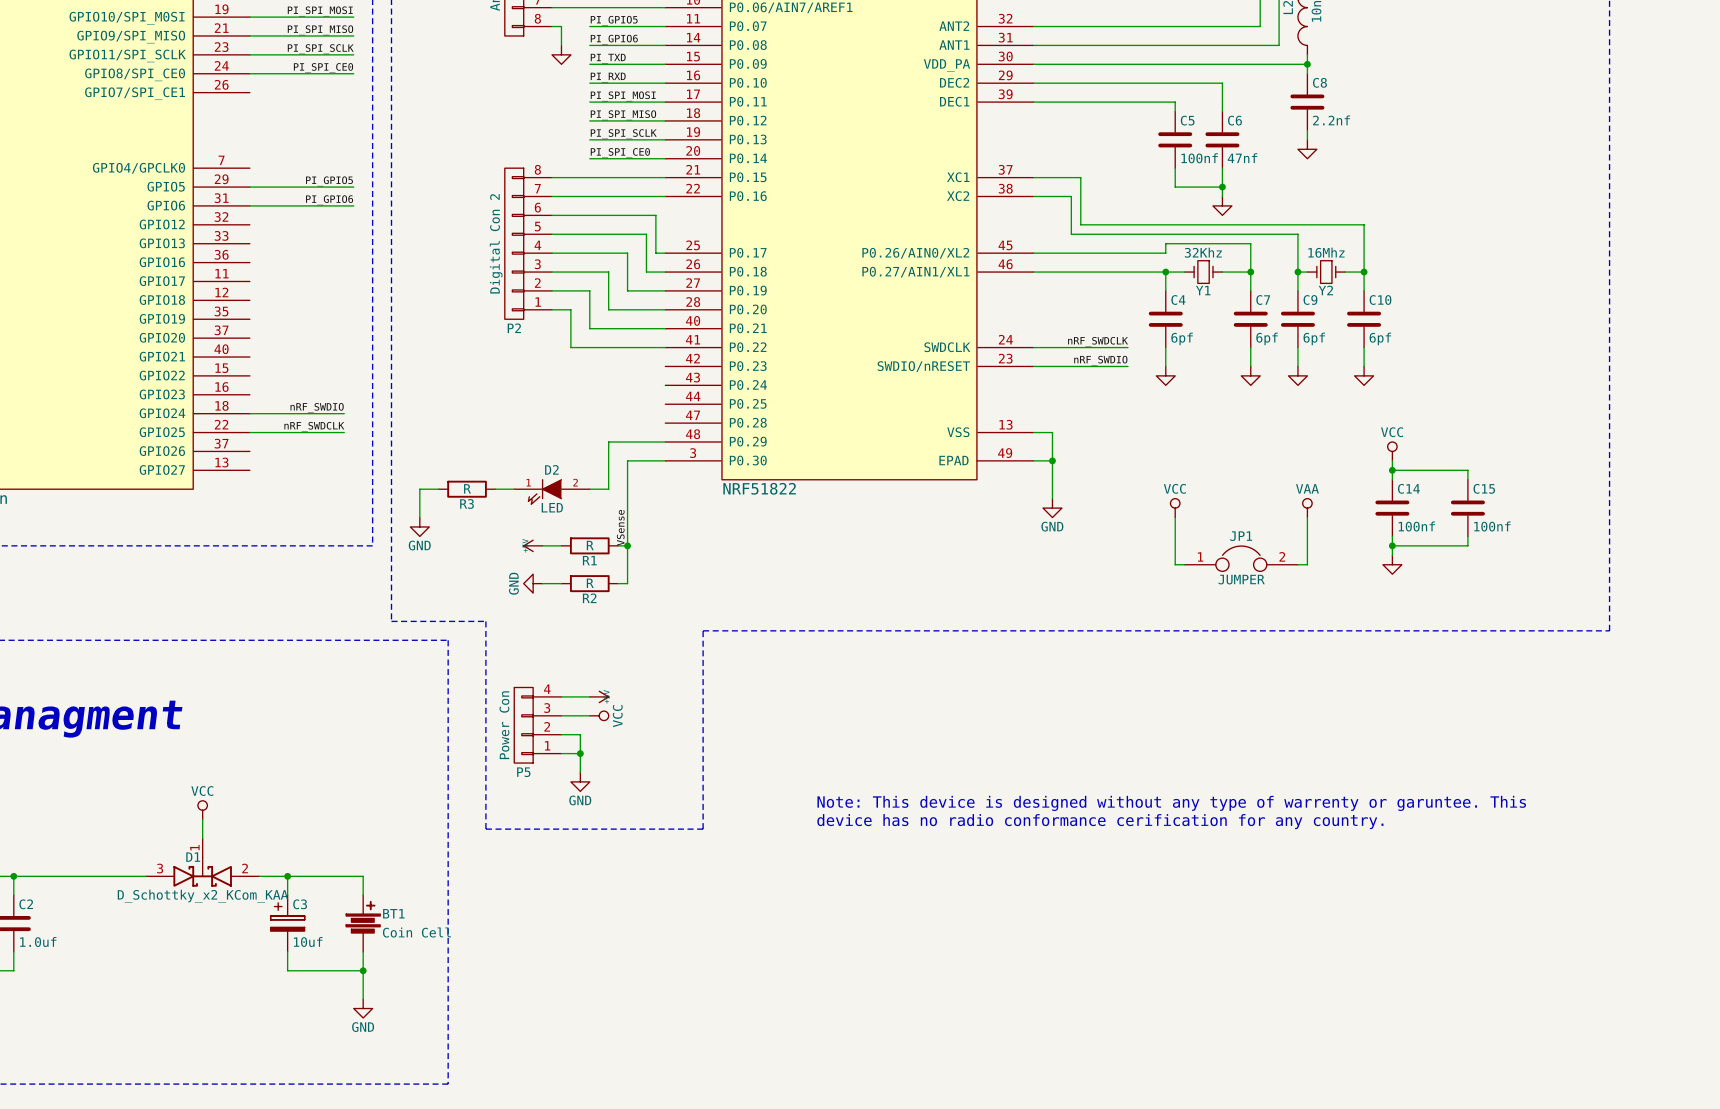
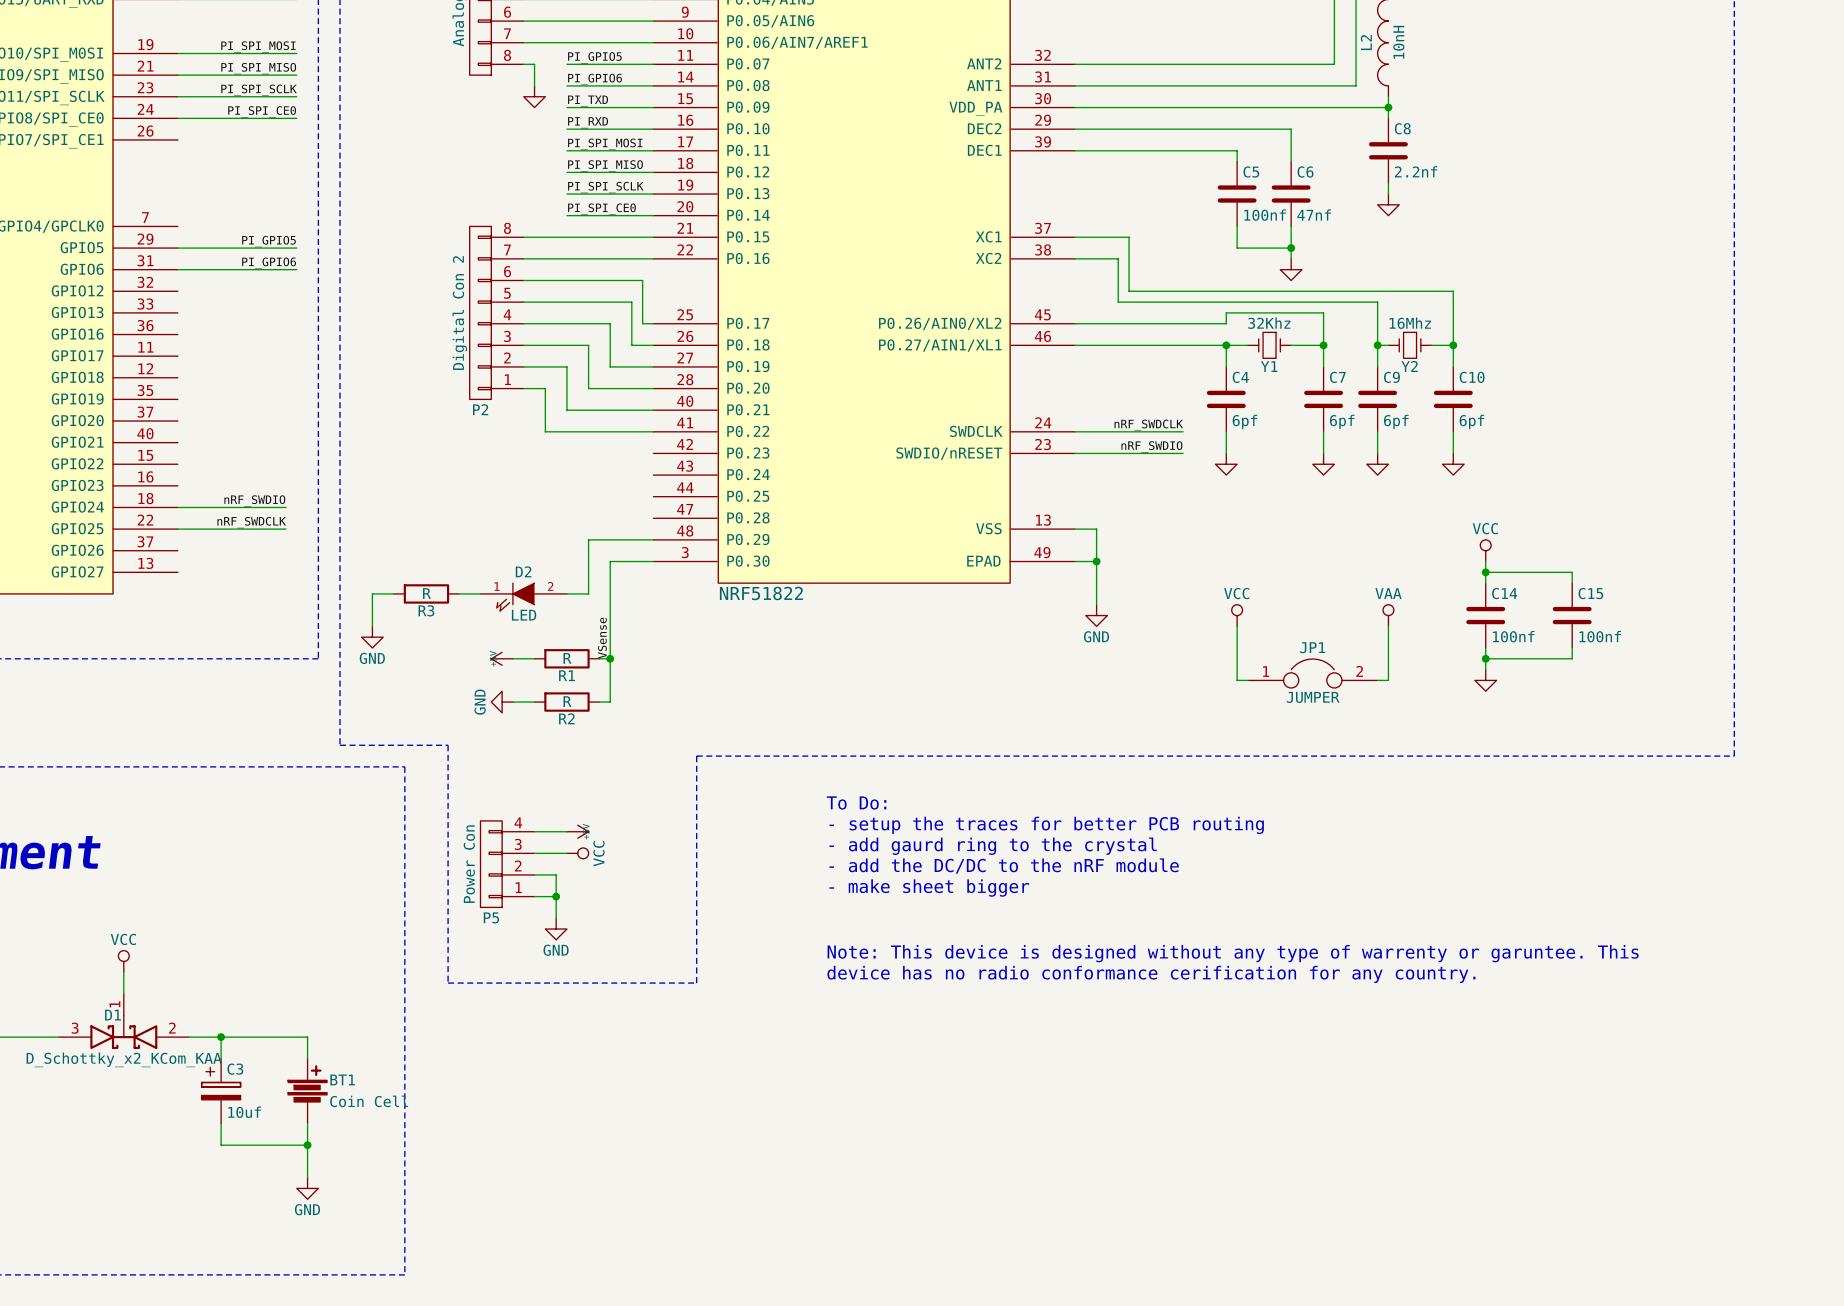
text: none -> To Do: (856, 802)
text: none -> - setup the traces for better PCB routing (1046, 825)
text: none -> - add gaurd ring to the crystal (993, 846)
text: none -> - add the DC/DC to the nRF module (1004, 866)
text: none -> - make sheet bigger (929, 888)

